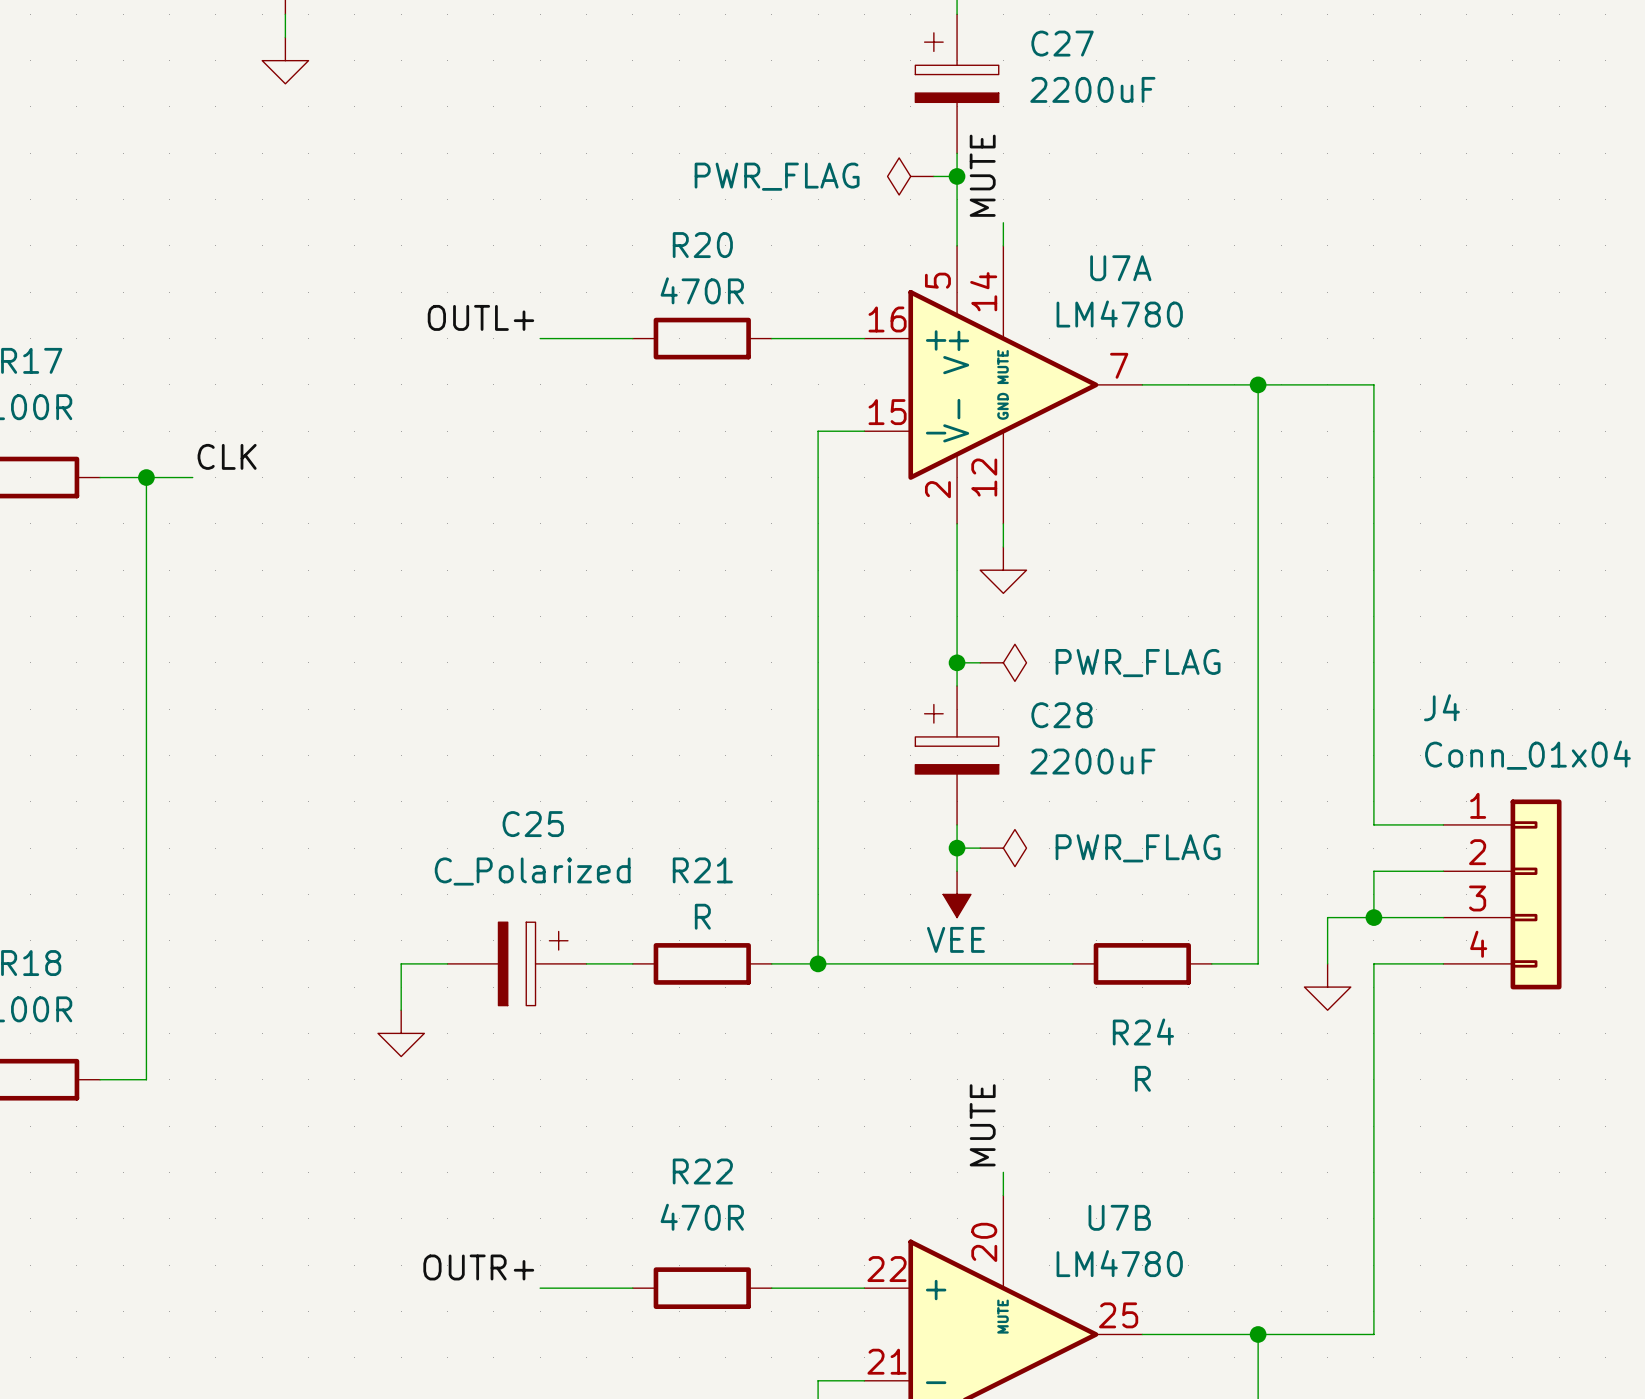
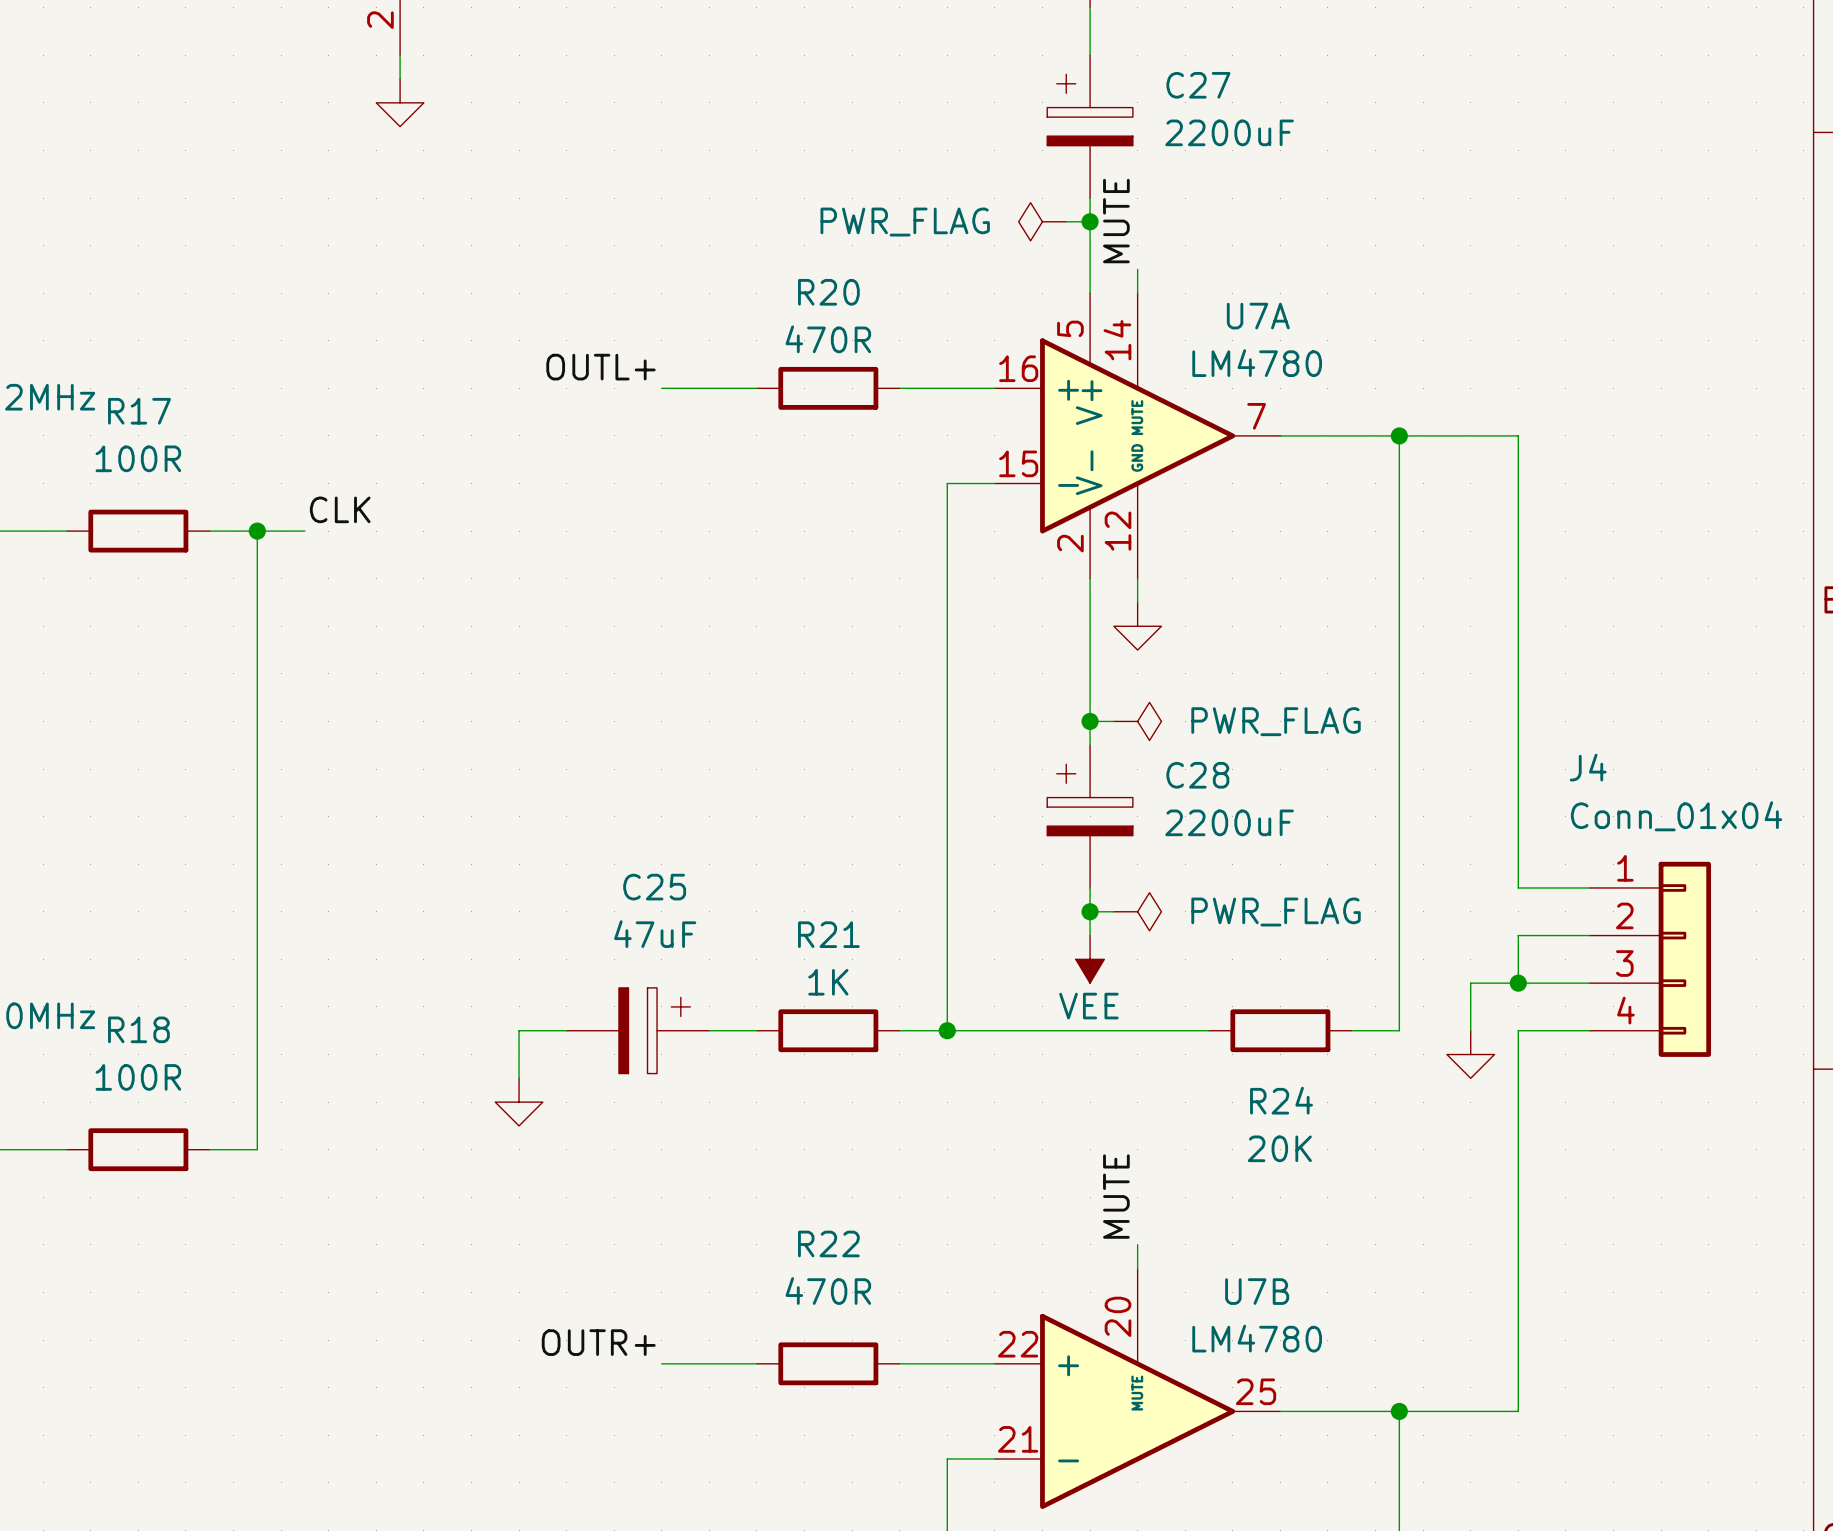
C25 value: C_Polarized (532, 871) -> 47uF (655, 934)
R21 value: R (702, 916) -> 1K (828, 982)
R24 value: R (1142, 1078) -> 20K (1279, 1148)

